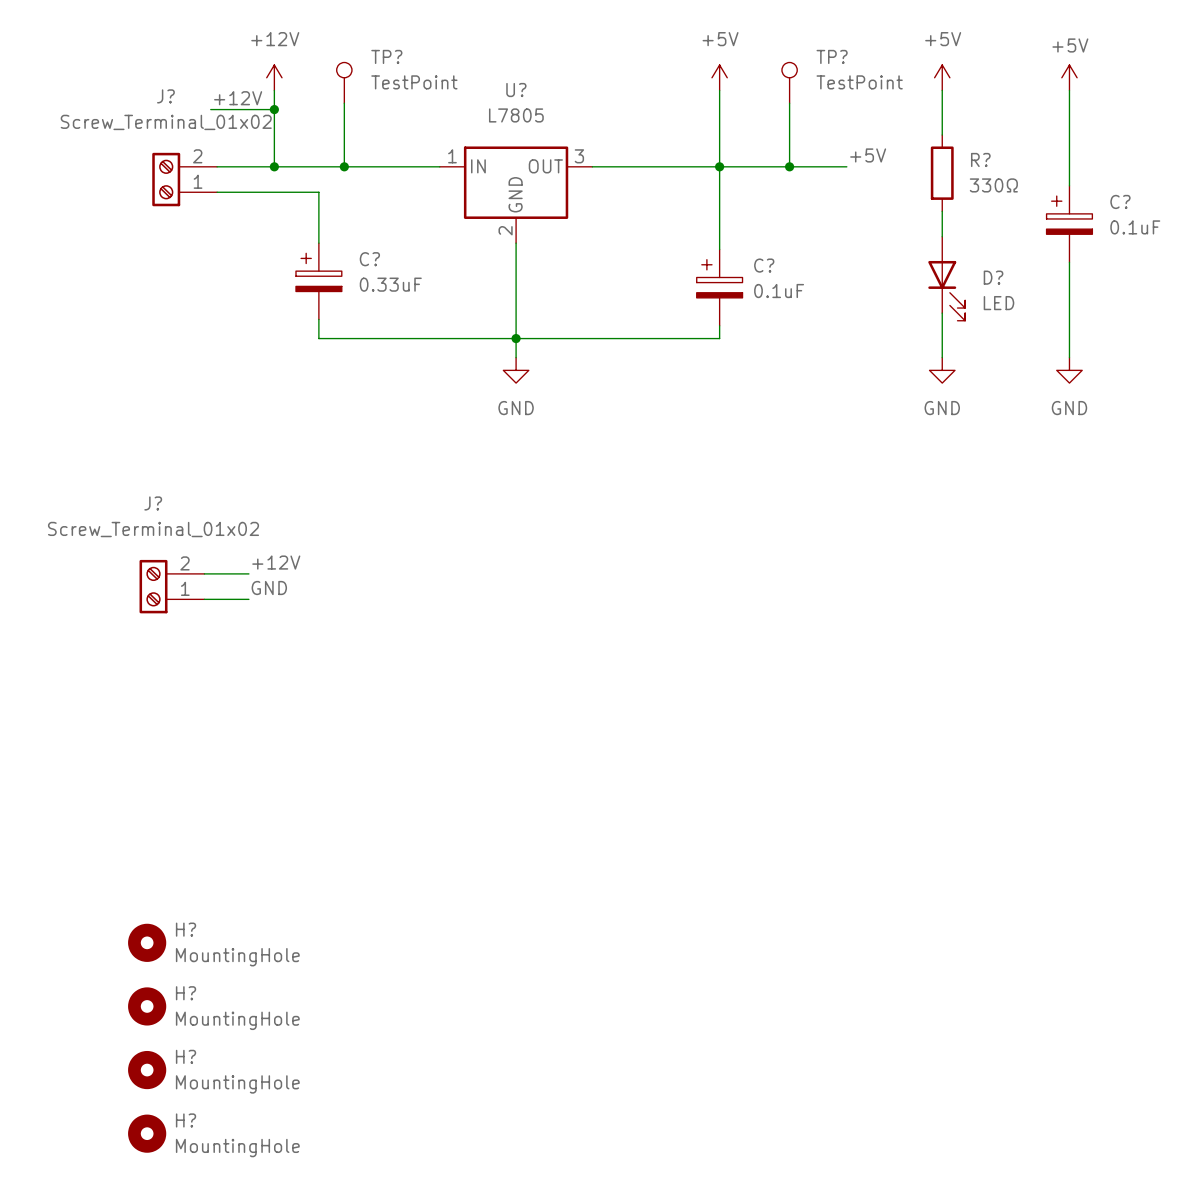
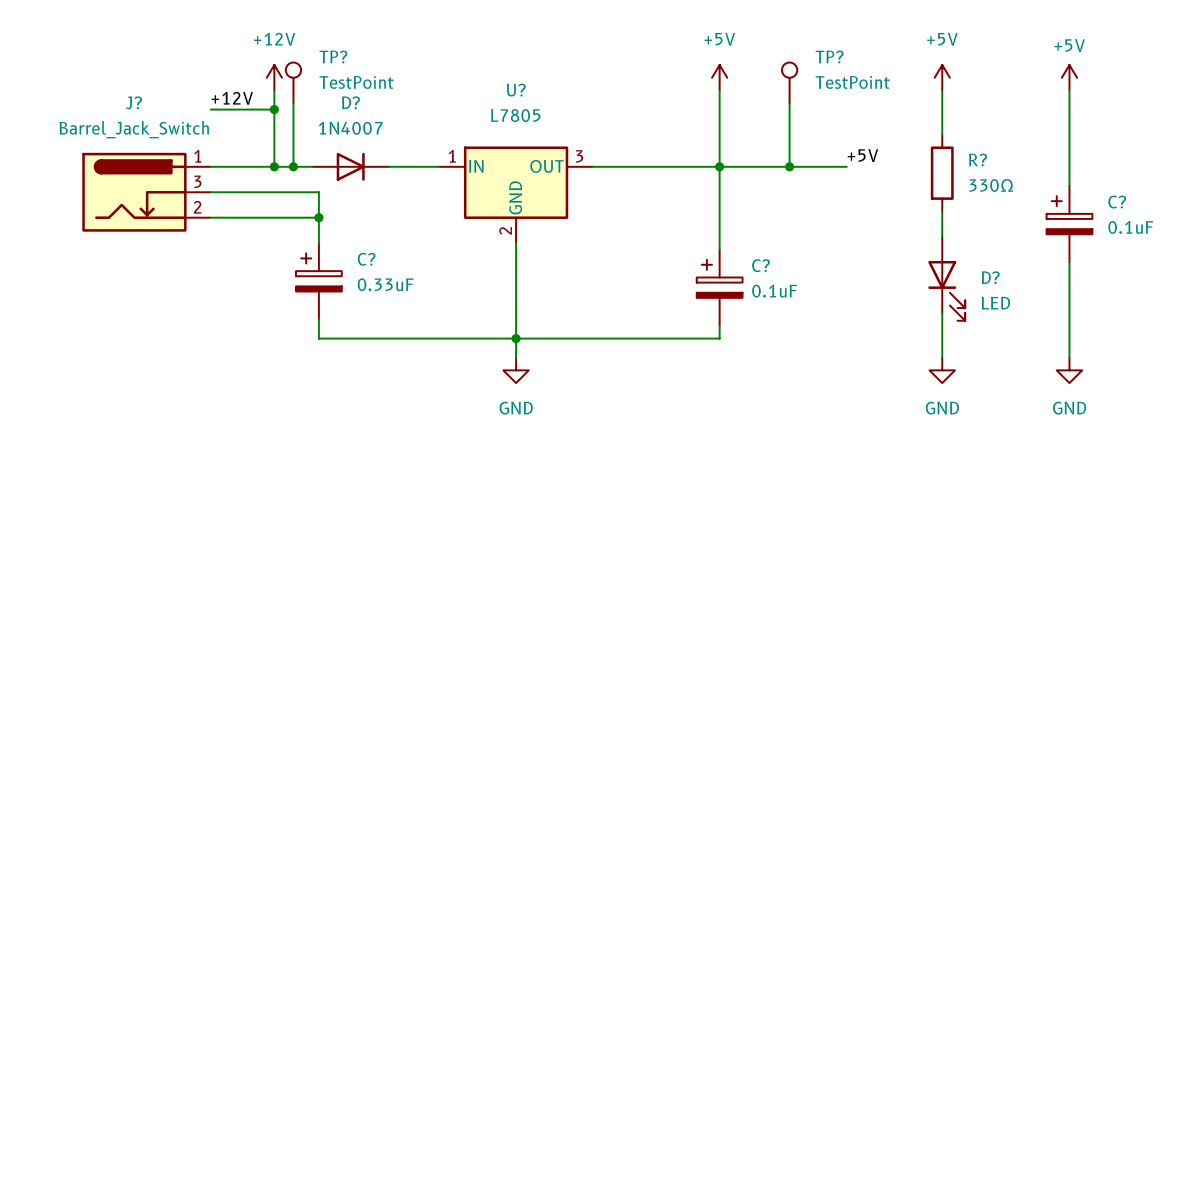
TP? position: (344, 82) -> (293, 82)
wire: (344, 103) (344, 166) -> (293, 103) (293, 166)
junction: none -> (293, 166)
junction: (344, 166) -> none
D?: none -> 1N4007 (350, 166)
J?: Screw_Terminal_01x02 (184, 179) -> none
J?: none -> Barrel_Jack_Switch (146, 192)
wire: none -> (210, 217) (318, 217)
junction: none -> (318, 217)
label: +12V (276, 562) -> none
wire: (204, 573) (248, 573) -> none
J?: Screw_Terminal_01x02 (171, 586) -> none
label: GND (269, 588) -> none
wire: (204, 599) (248, 599) -> none
H?: MountingHole (147, 942) -> none
H?: MountingHole (147, 1006) -> none
H?: MountingHole (147, 1070) -> none
H?: MountingHole (147, 1133) -> none

